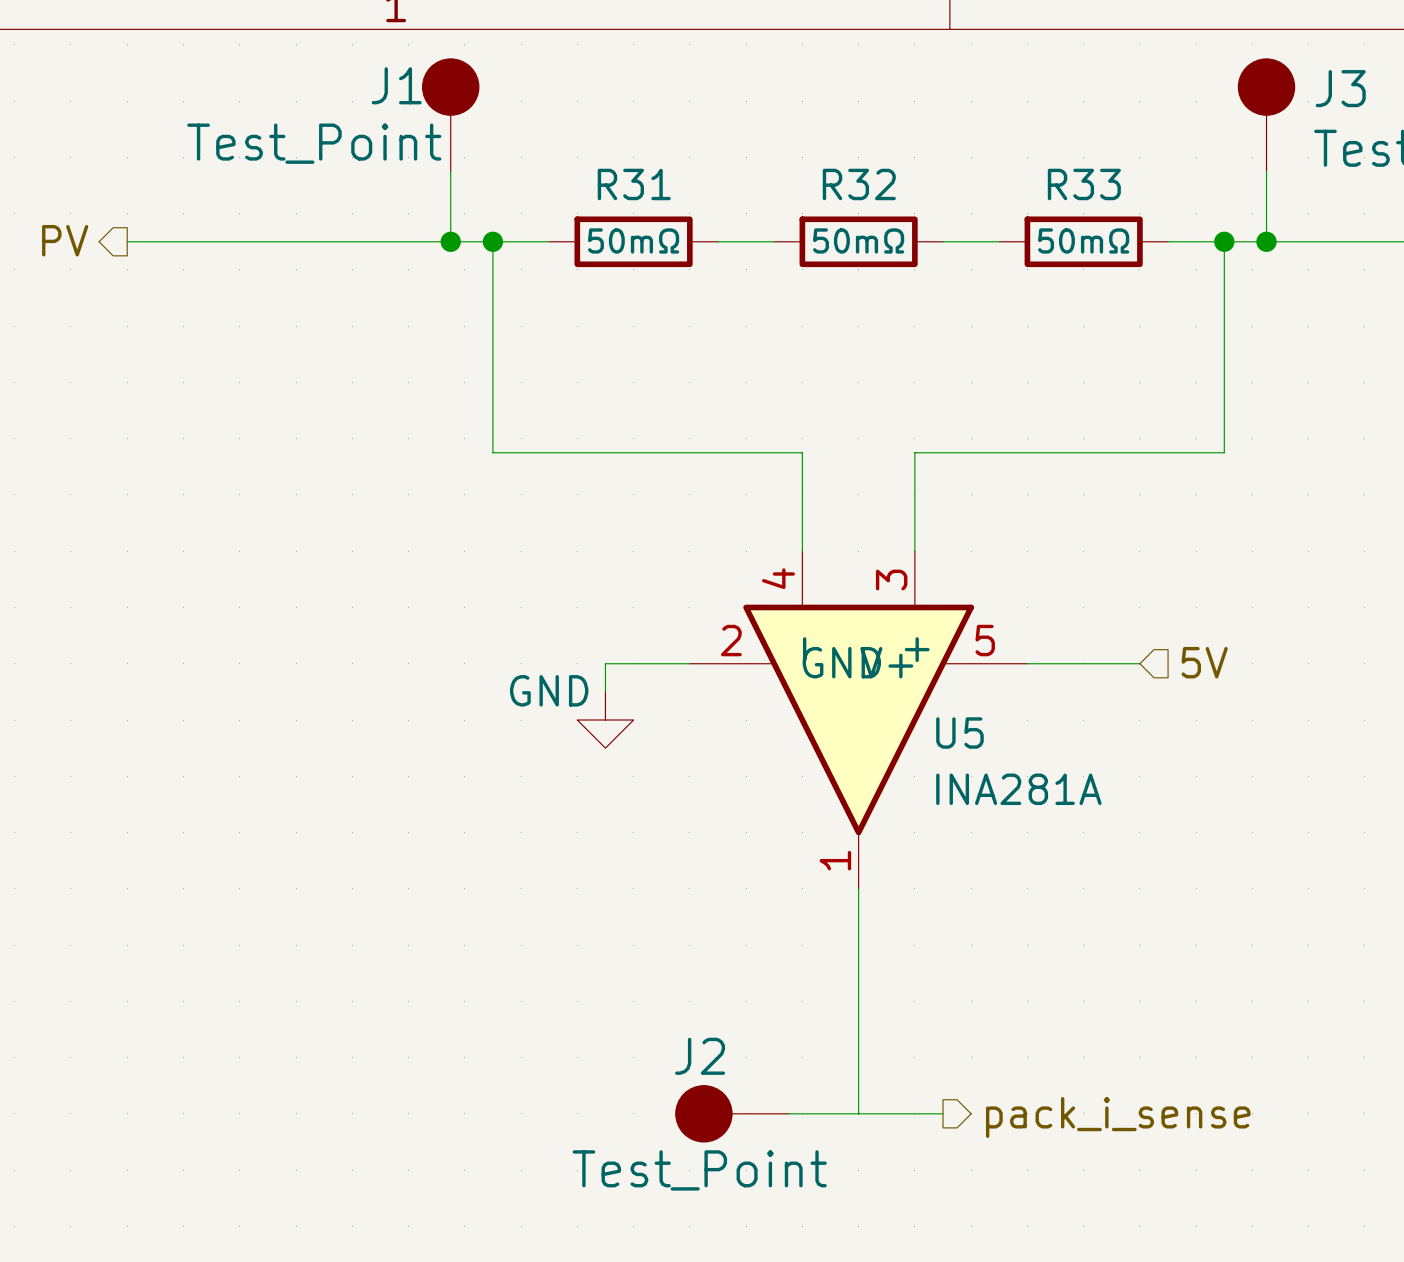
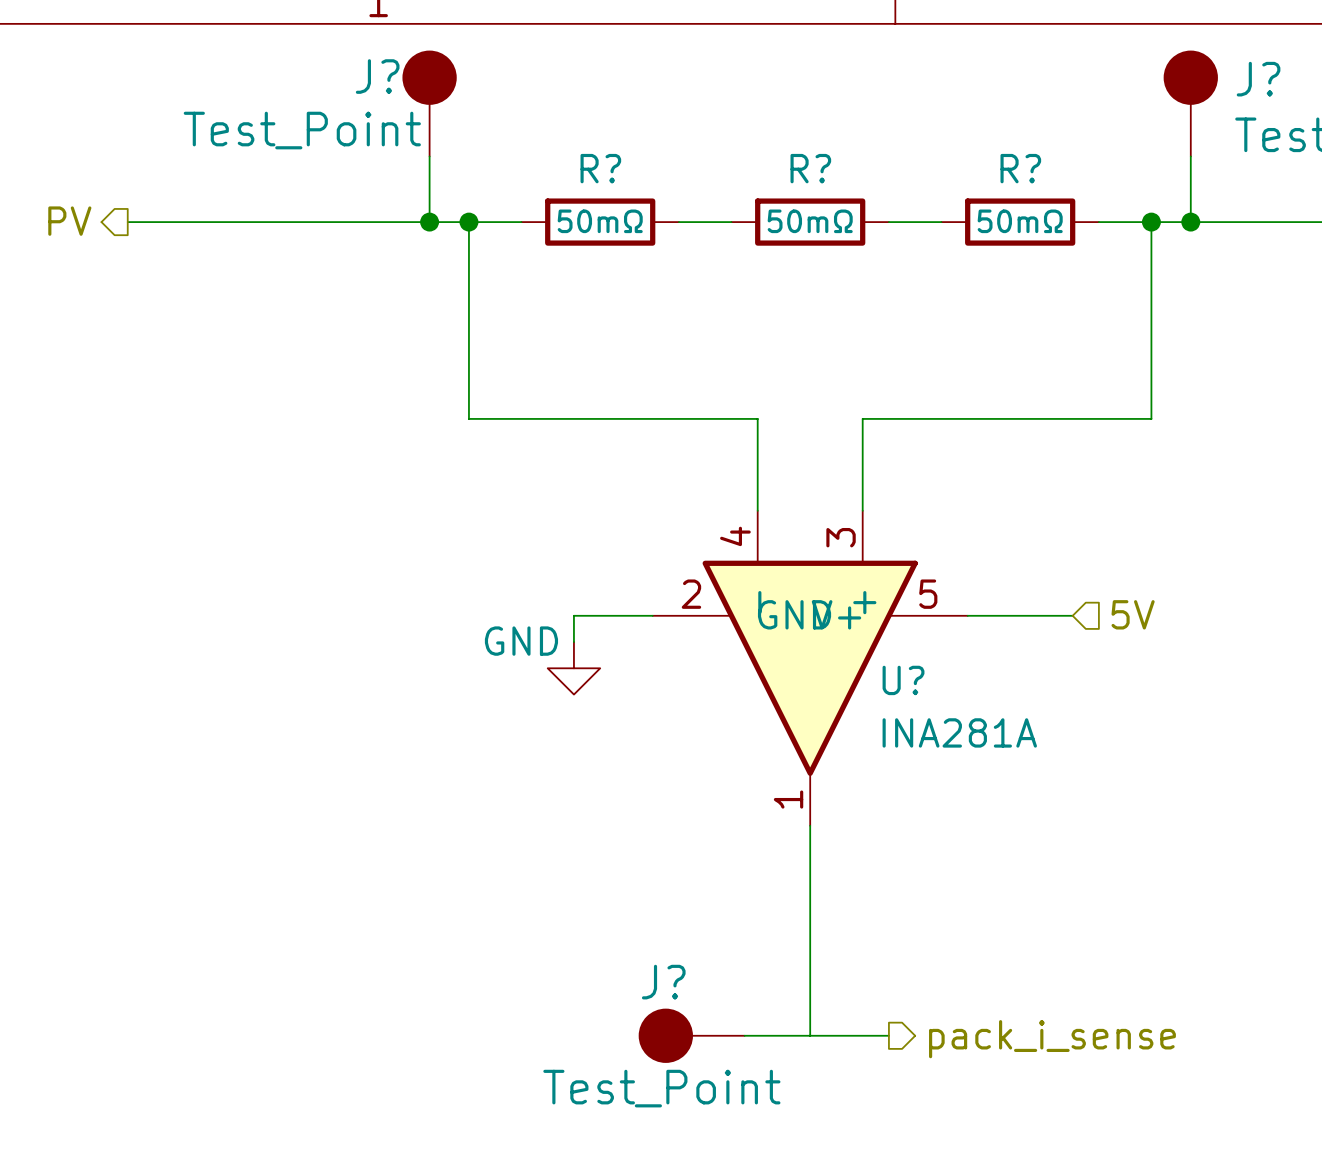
J1 name: J1 (396, 85) -> J? (377, 76)
J3 name: J3 (1340, 88) -> J? (1258, 79)
R31 name: R31 (634, 184) -> R? (600, 168)
R32 name: R32 (859, 184) -> R? (810, 168)
R33 name: R33 (1084, 184) -> R? (1020, 168)
U5 name: U5 (959, 733) -> U? (903, 680)
J2 name: J2 (700, 1056) -> J? (663, 982)

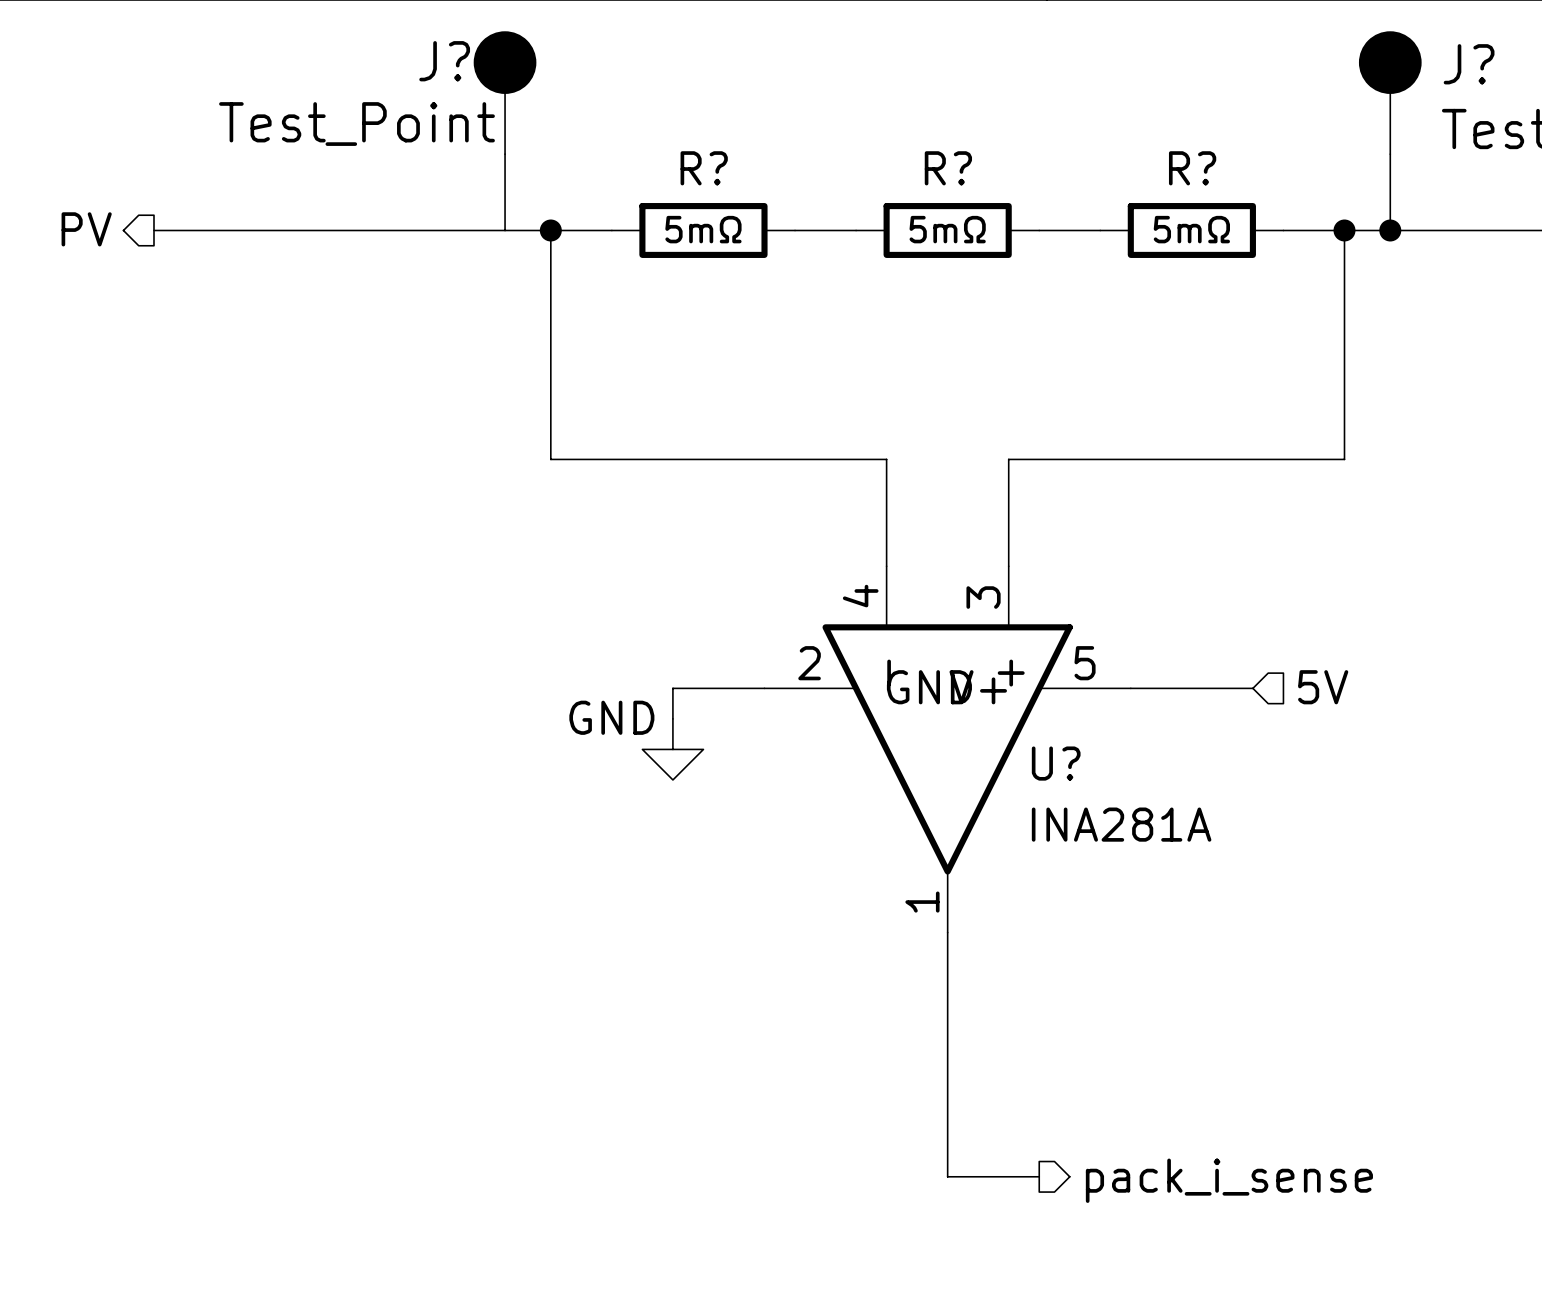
R? value: 50mΩ (600, 221) -> 5mΩ (703, 229)
R? value: 50mΩ (810, 221) -> 5mΩ (947, 229)
R? value: 50mΩ (1020, 221) -> 5mΩ (1191, 229)
junction: (429, 222) -> none
J?: Test_Point (692, 1035) -> none
wire: (744, 1035) (810, 1035) -> none

